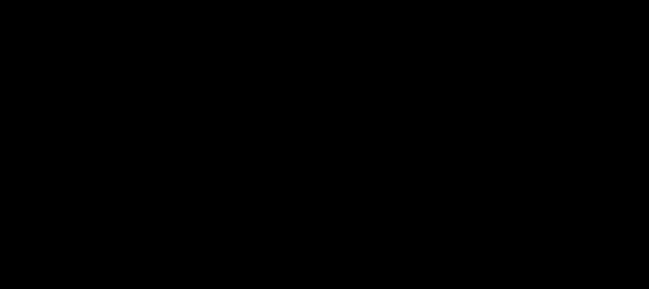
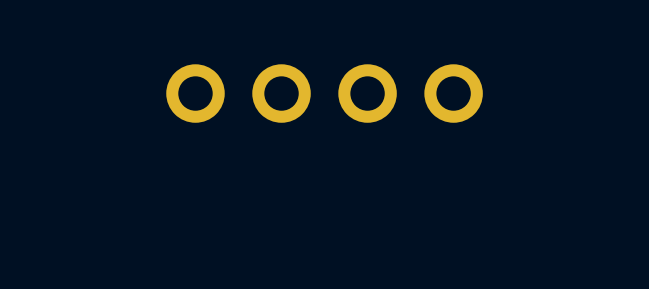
part: none -> (324, 93)

